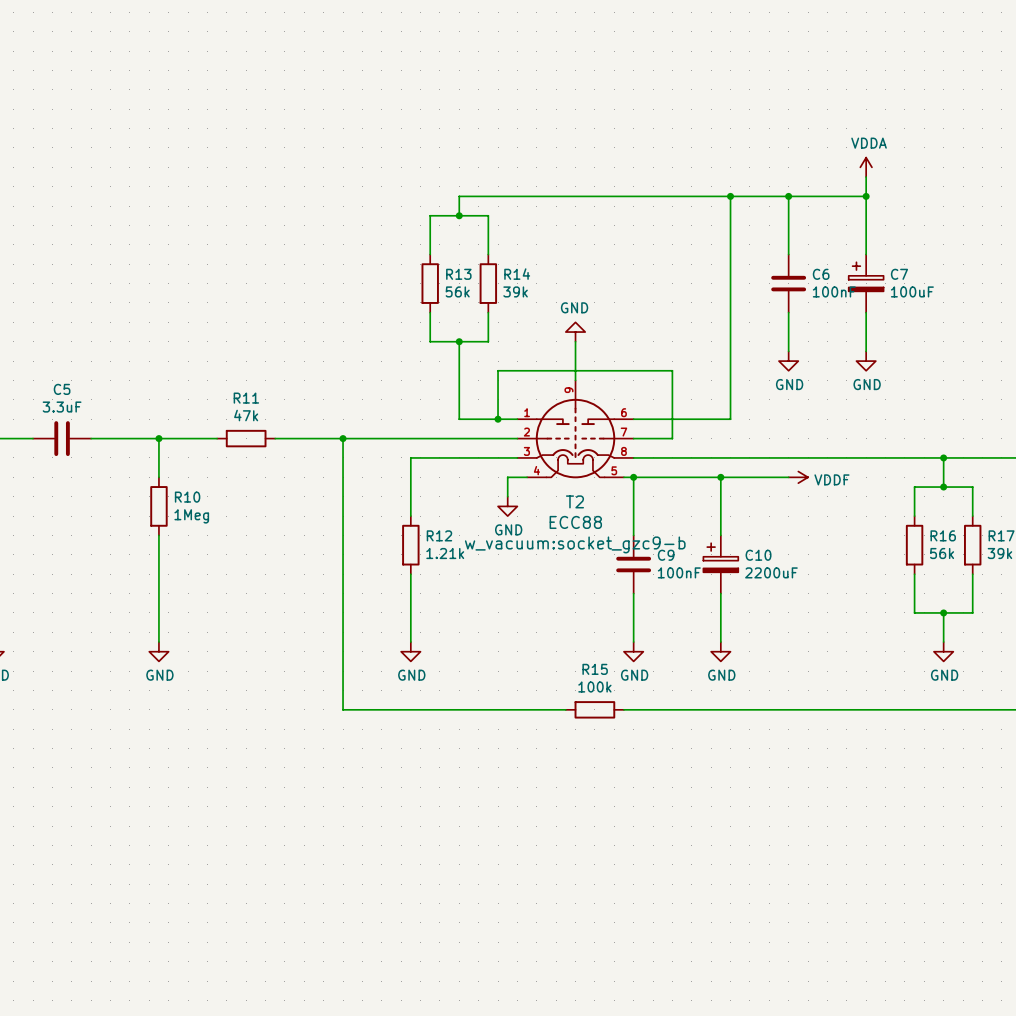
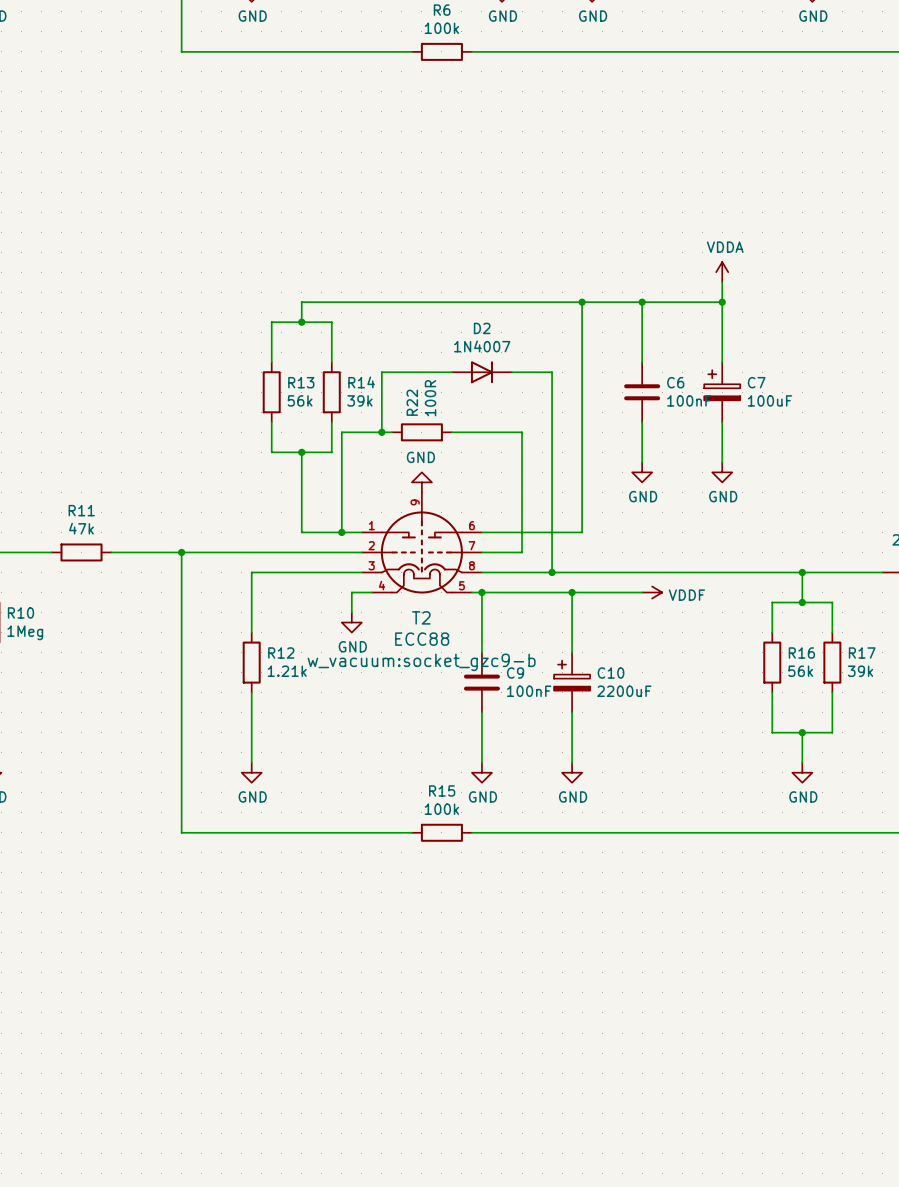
wire: none -> (451, 372) (381, 372) (381, 432)
D2: none -> 1N4007 (481, 372)
wire: none -> (511, 372) (552, 372) (552, 572)
junction: none -> (381, 432)
wire: none -> (391, 432) (341, 432) (341, 482)
R22: none -> 100R (421, 432)
power symbol position: GND (575, 332) -> GND (421, 482)
wire: (575, 341) (575, 380) -> none
wire: (498, 370) (672, 370) -> (451, 432) (522, 432) (522, 482)
junction: none -> (552, 572)

